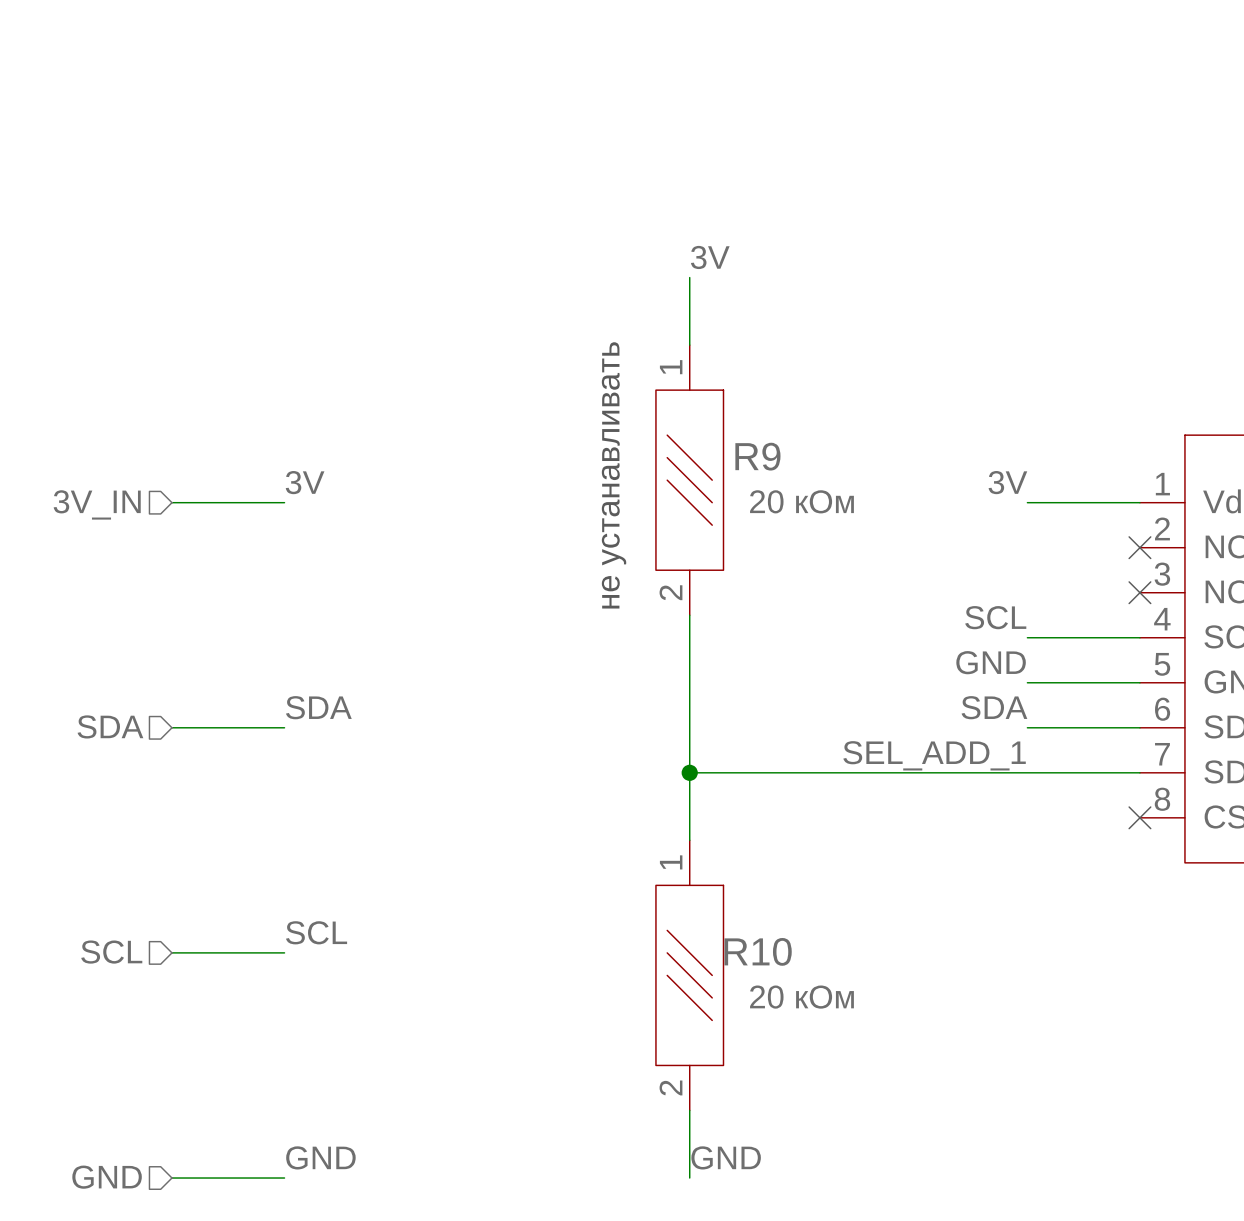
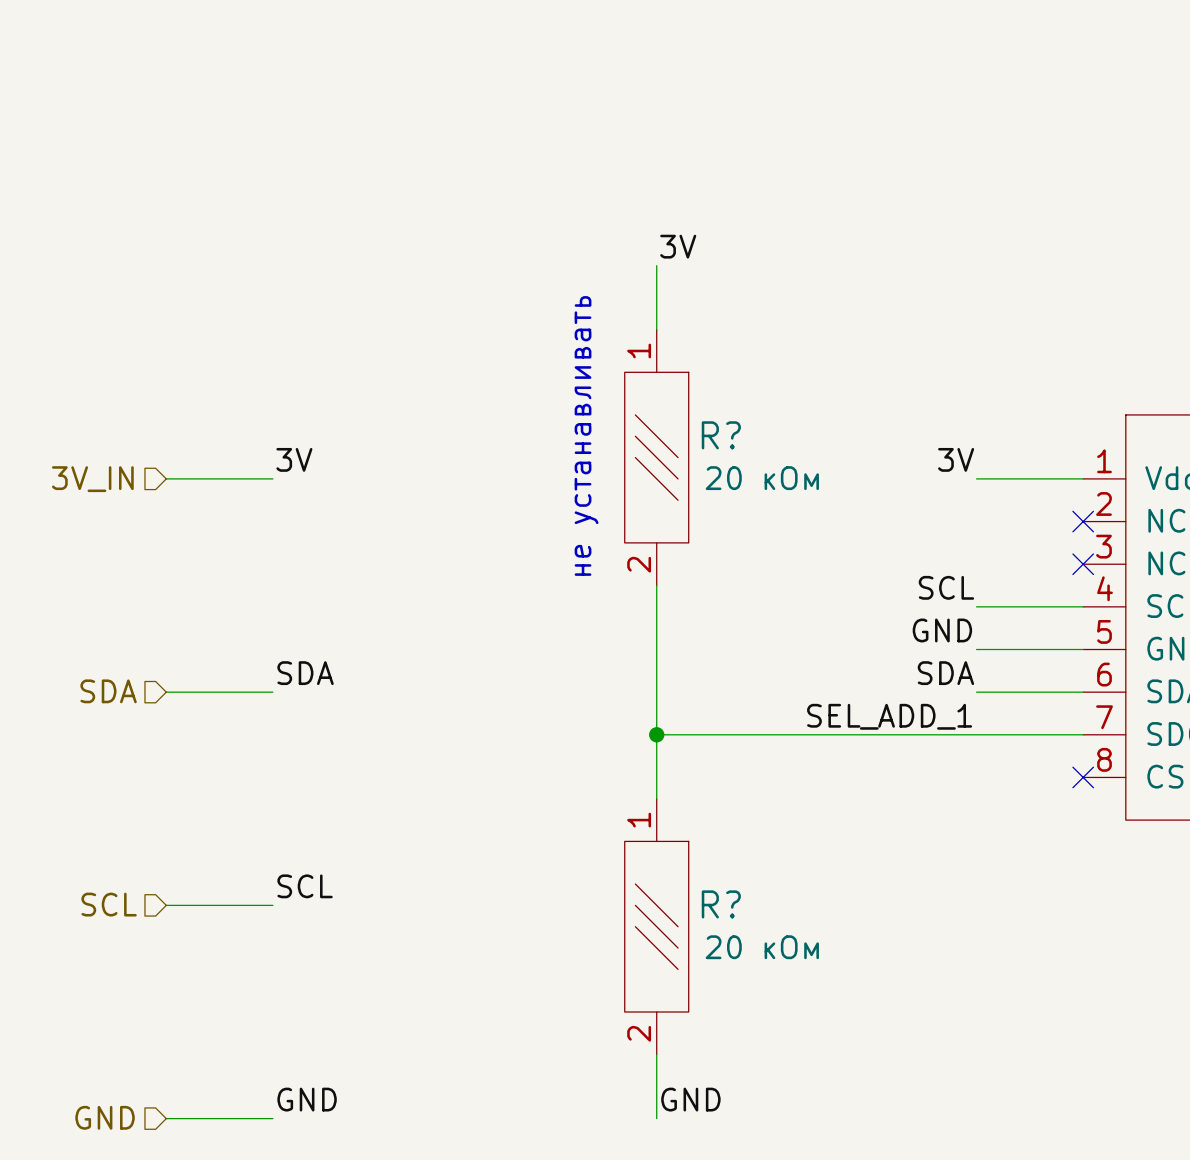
R9 name: R9 (757, 456) -> R? (721, 435)
R10 name: R10 (758, 951) -> R? (721, 904)

